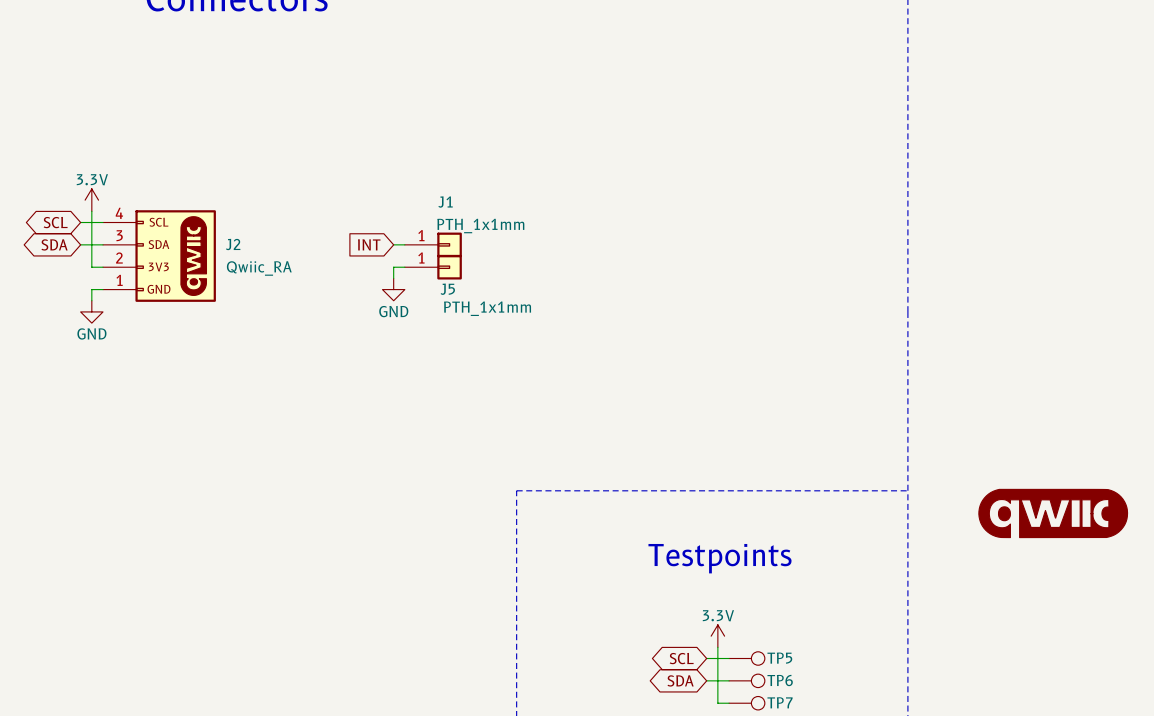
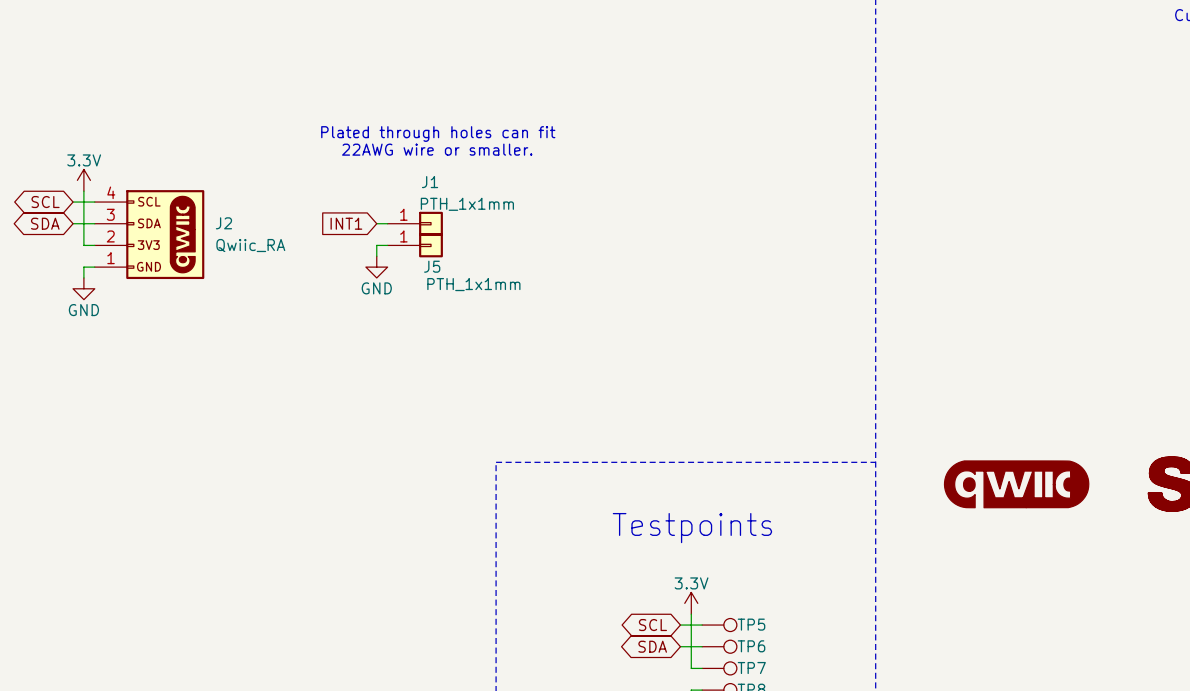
text: none -> Plated through holes can fit (438, 133)
text: none -> 22AWG wire or smaller. (437, 149)
global label: INT (369, 244) -> INT1 (346, 223)

